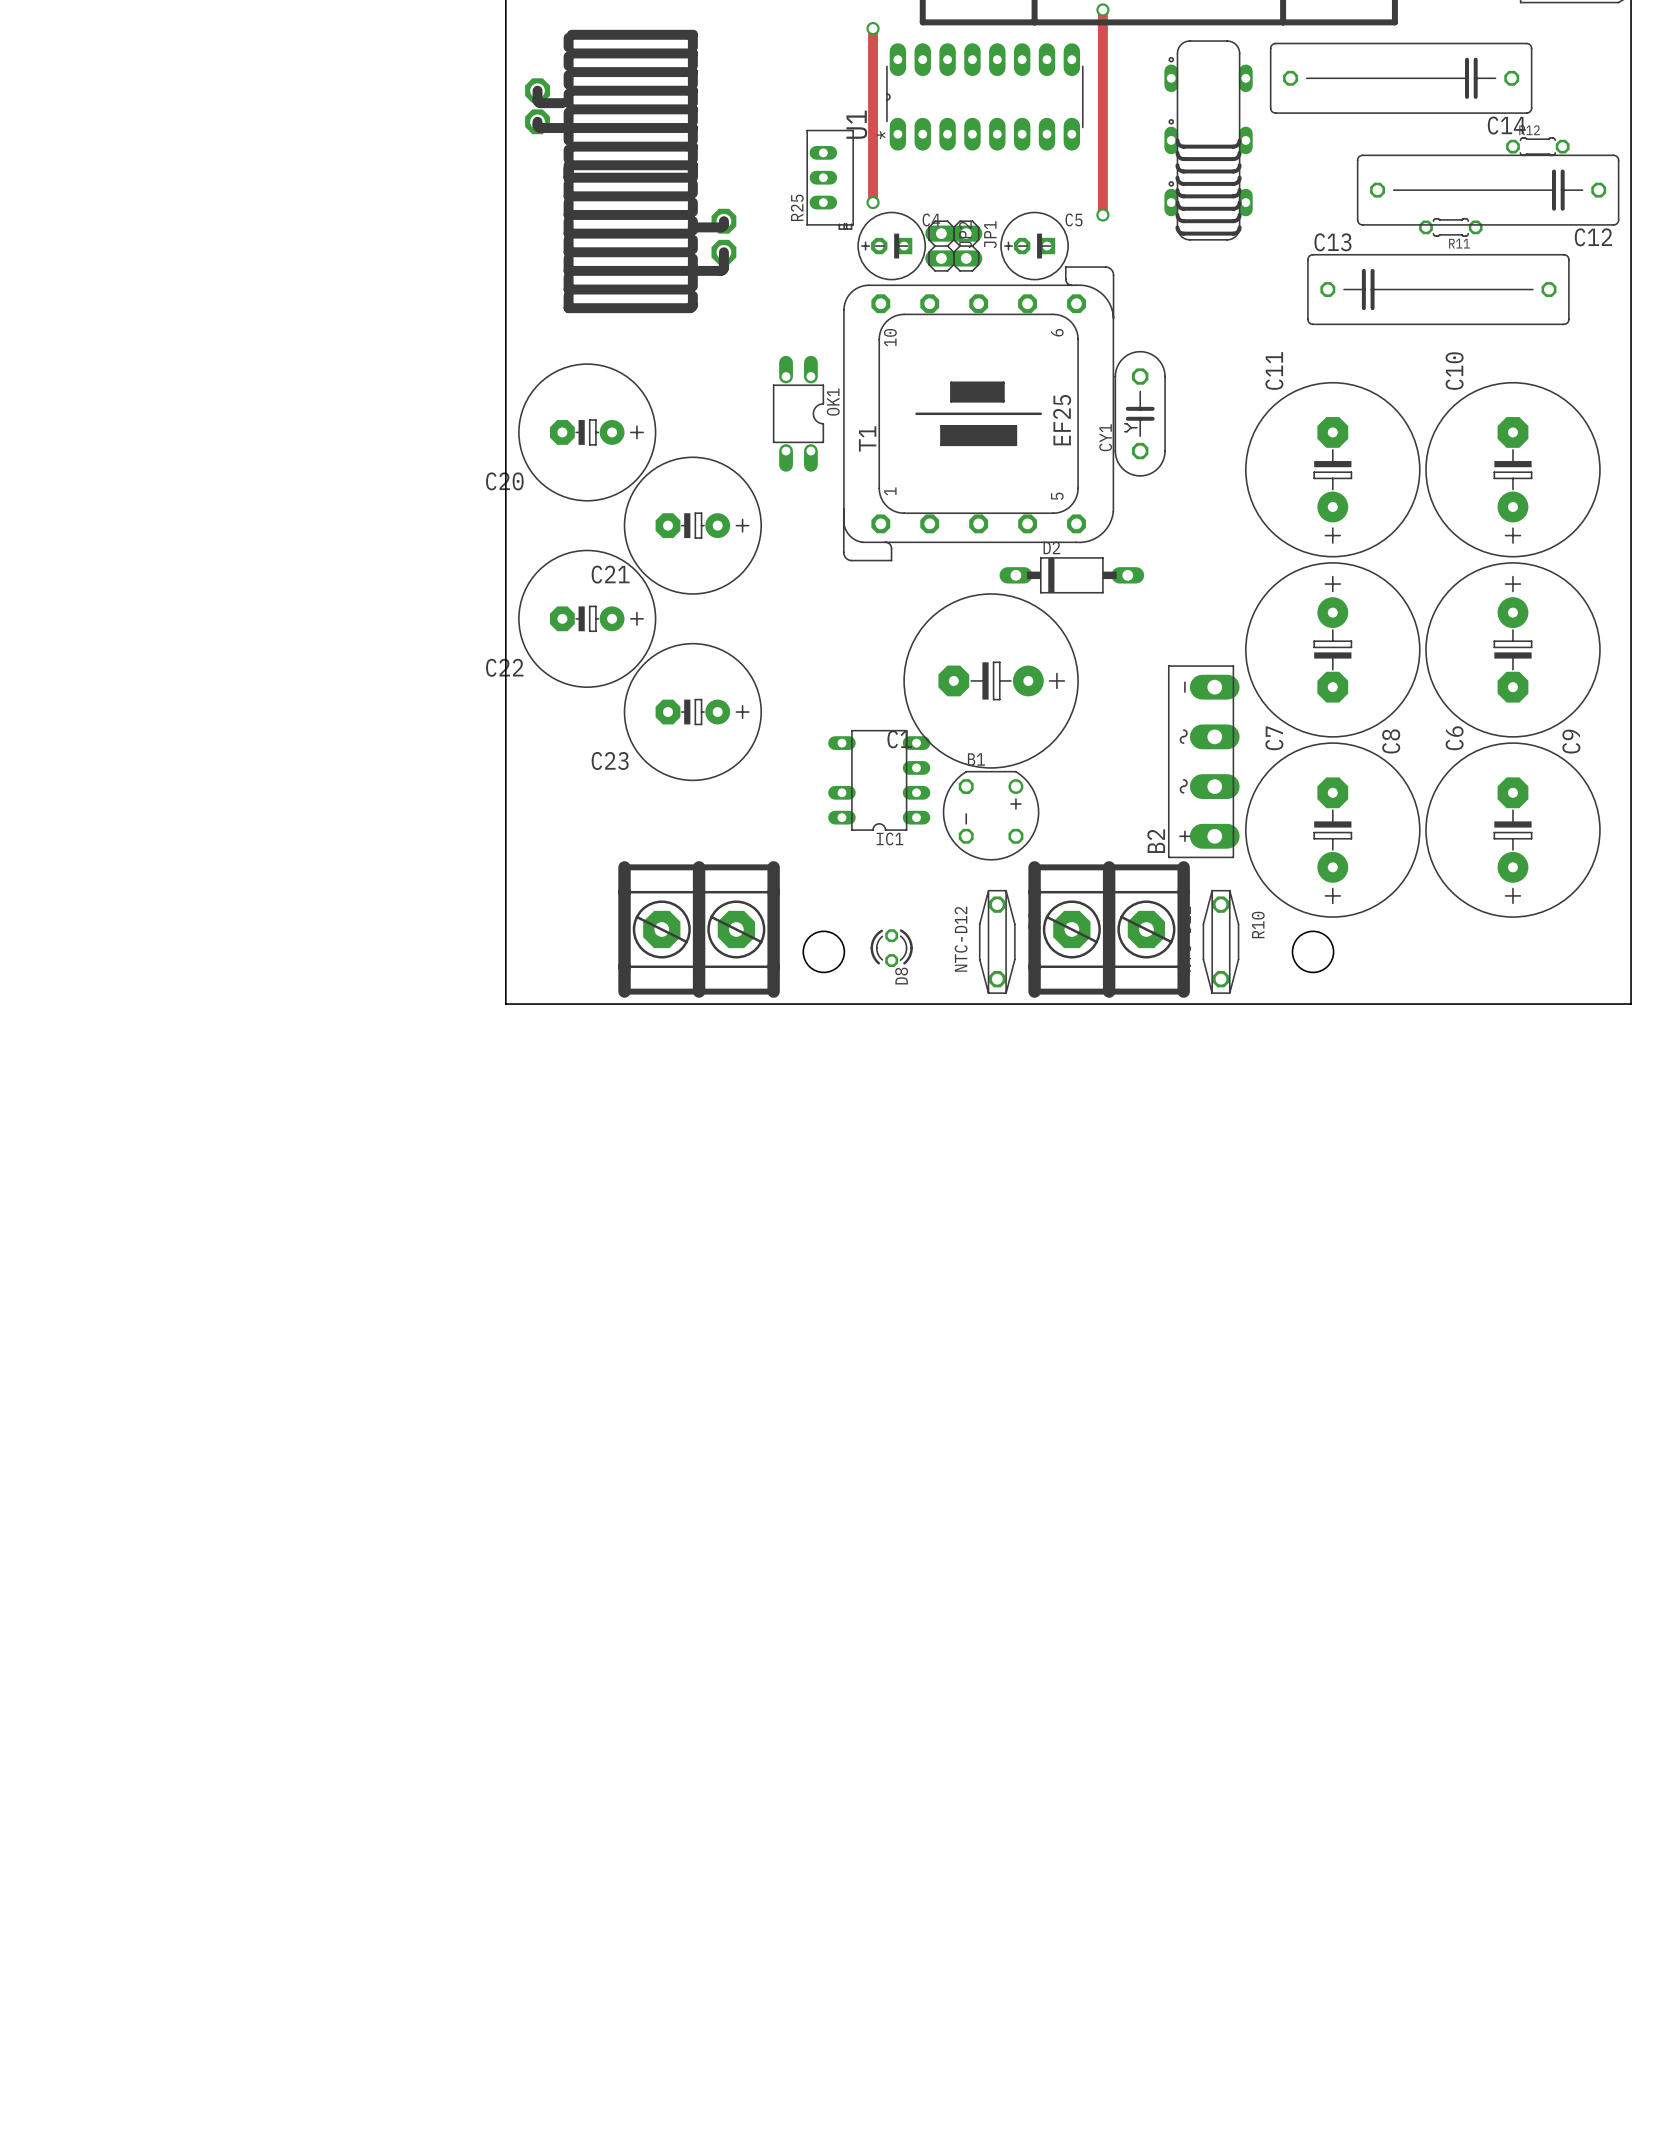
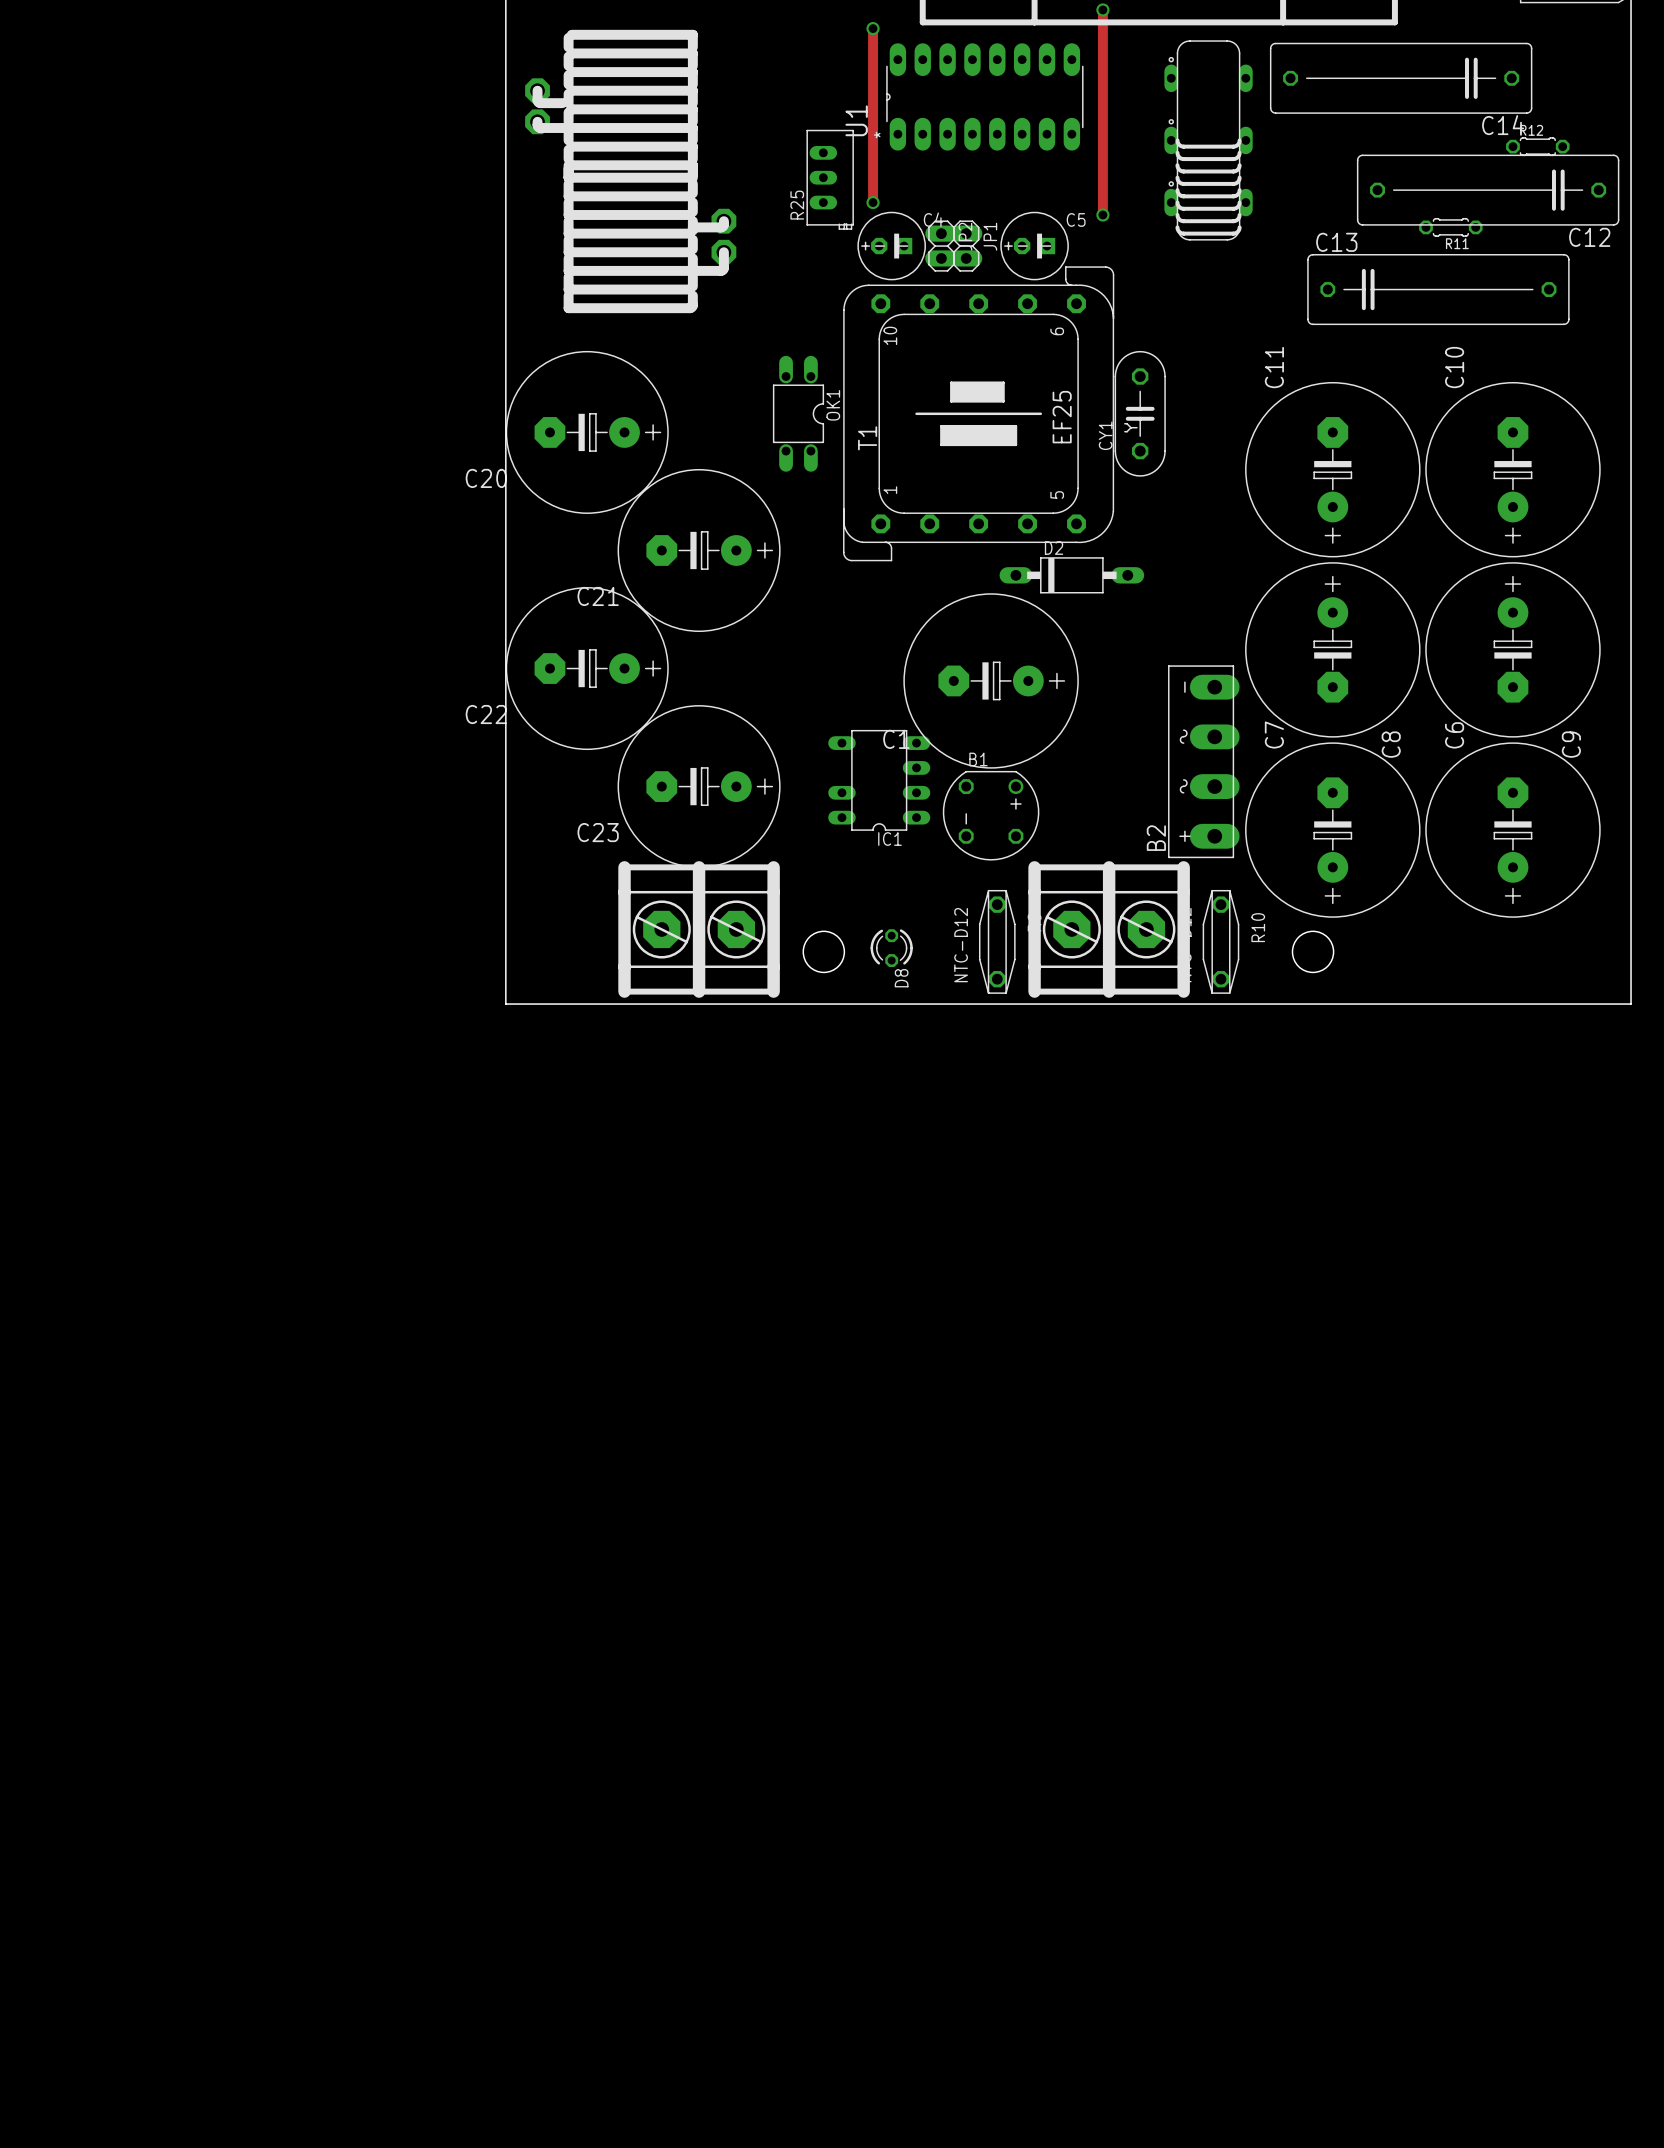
C20 footprint: [518, 363, 657, 502] -> [505, 350, 669, 514]
C21 footprint: [623, 456, 762, 595] -> [617, 468, 781, 633]
C22 footprint: [518, 549, 657, 688] -> [505, 587, 669, 751]
C23 footprint: [623, 642, 762, 782] -> [617, 705, 781, 869]

